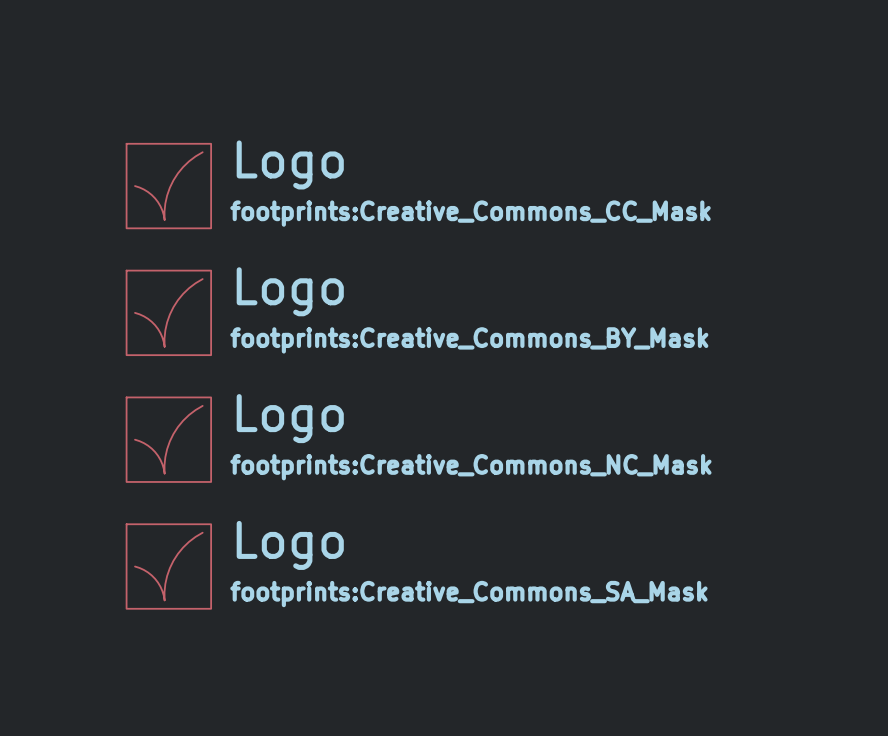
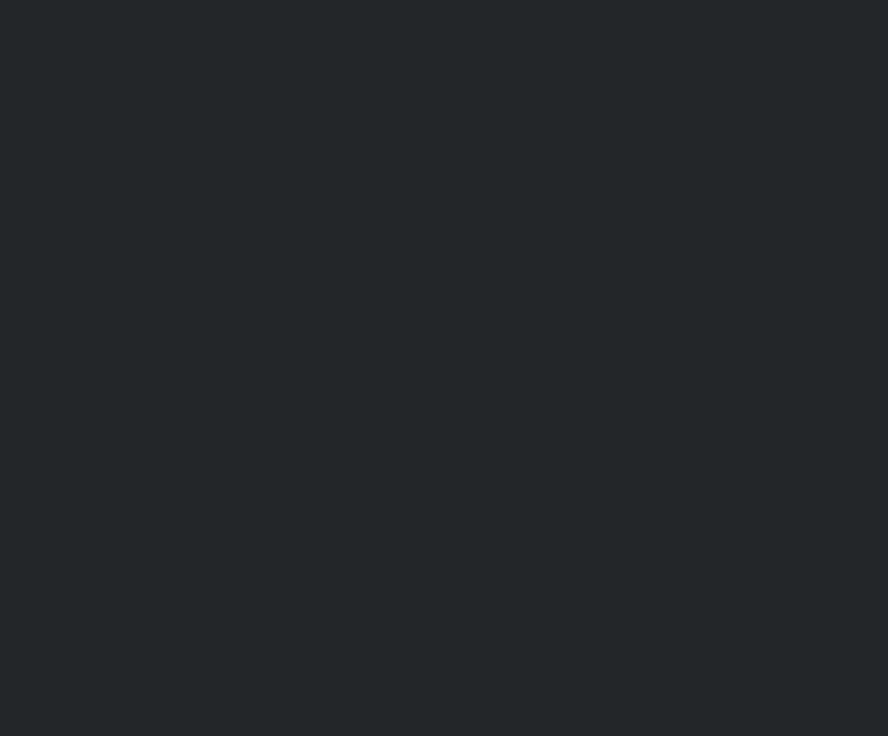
part: Logo (168, 186) -> none
part: Logo (168, 312) -> none
part: Logo (168, 439) -> none
part: Logo (168, 566) -> none

